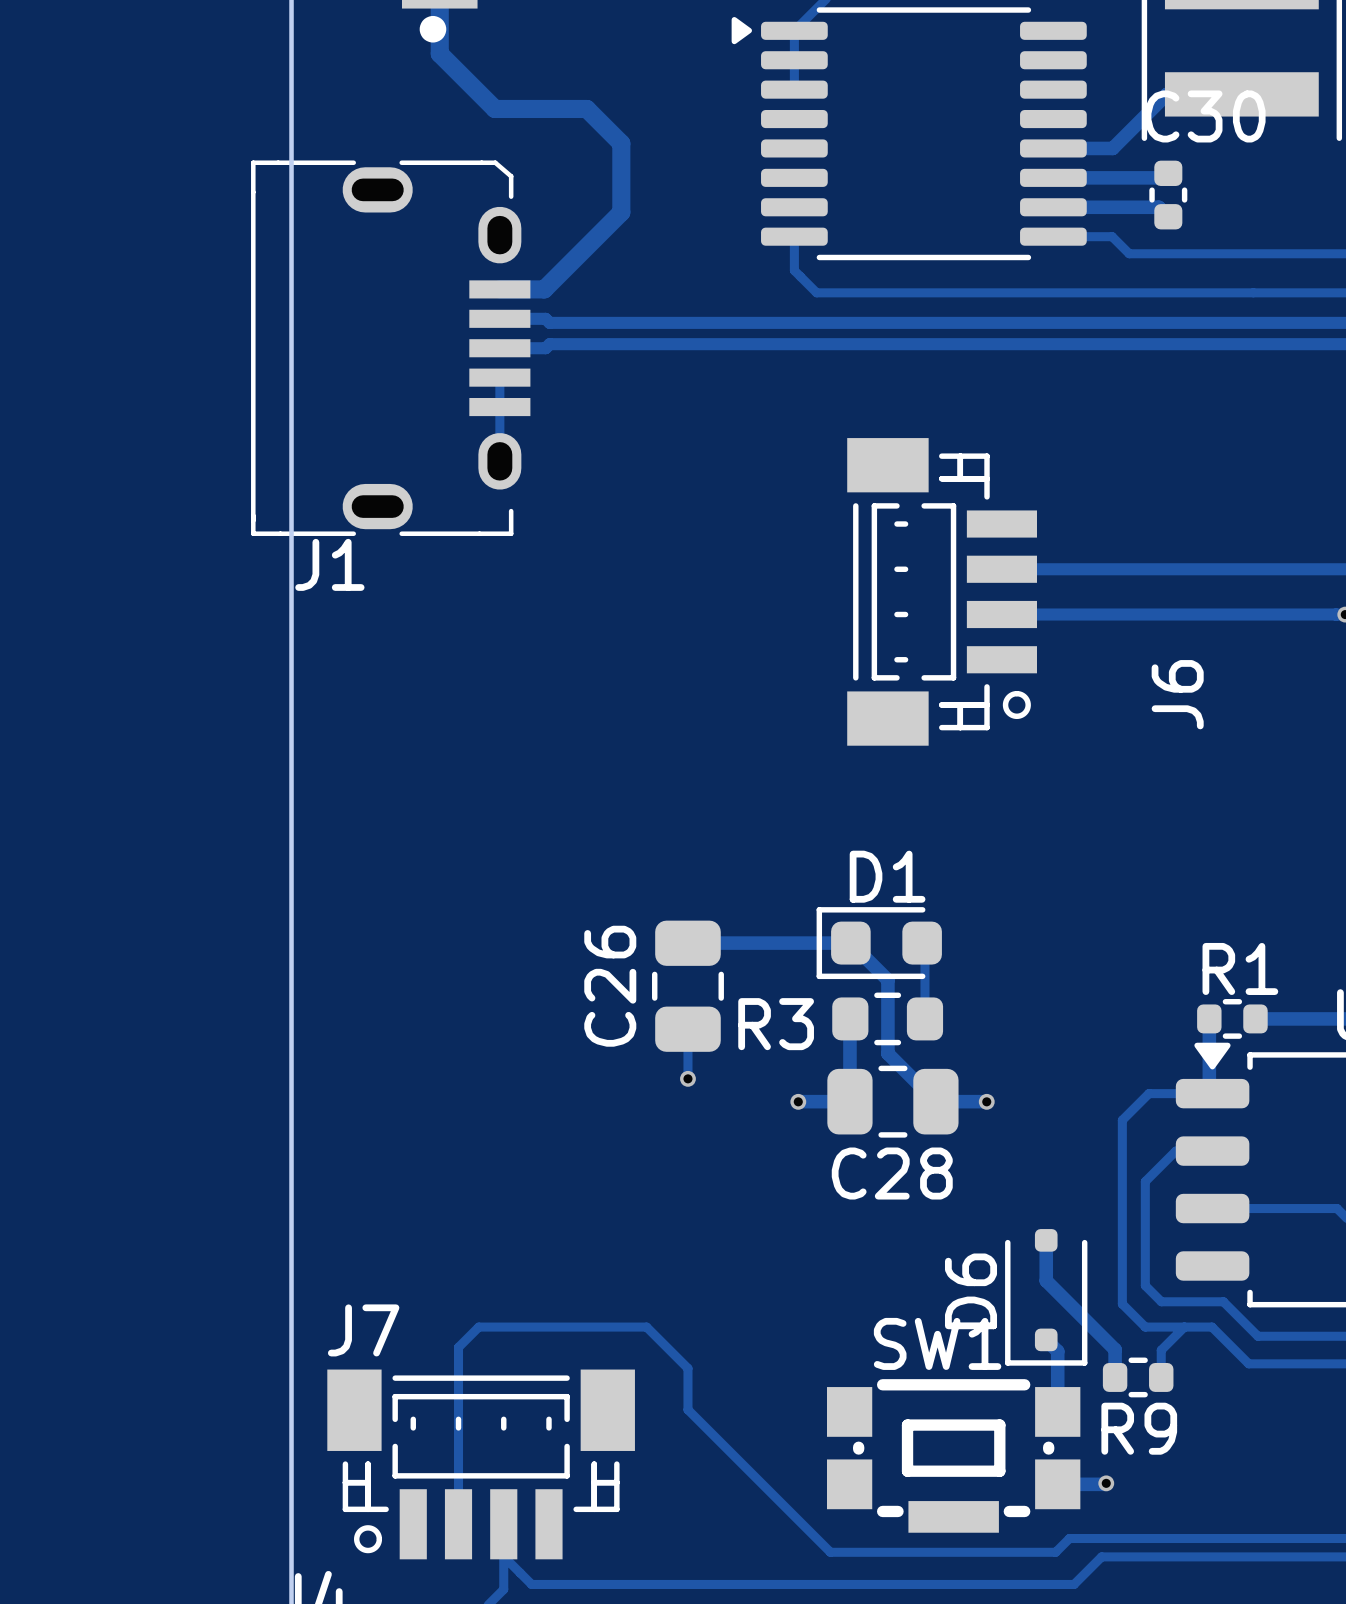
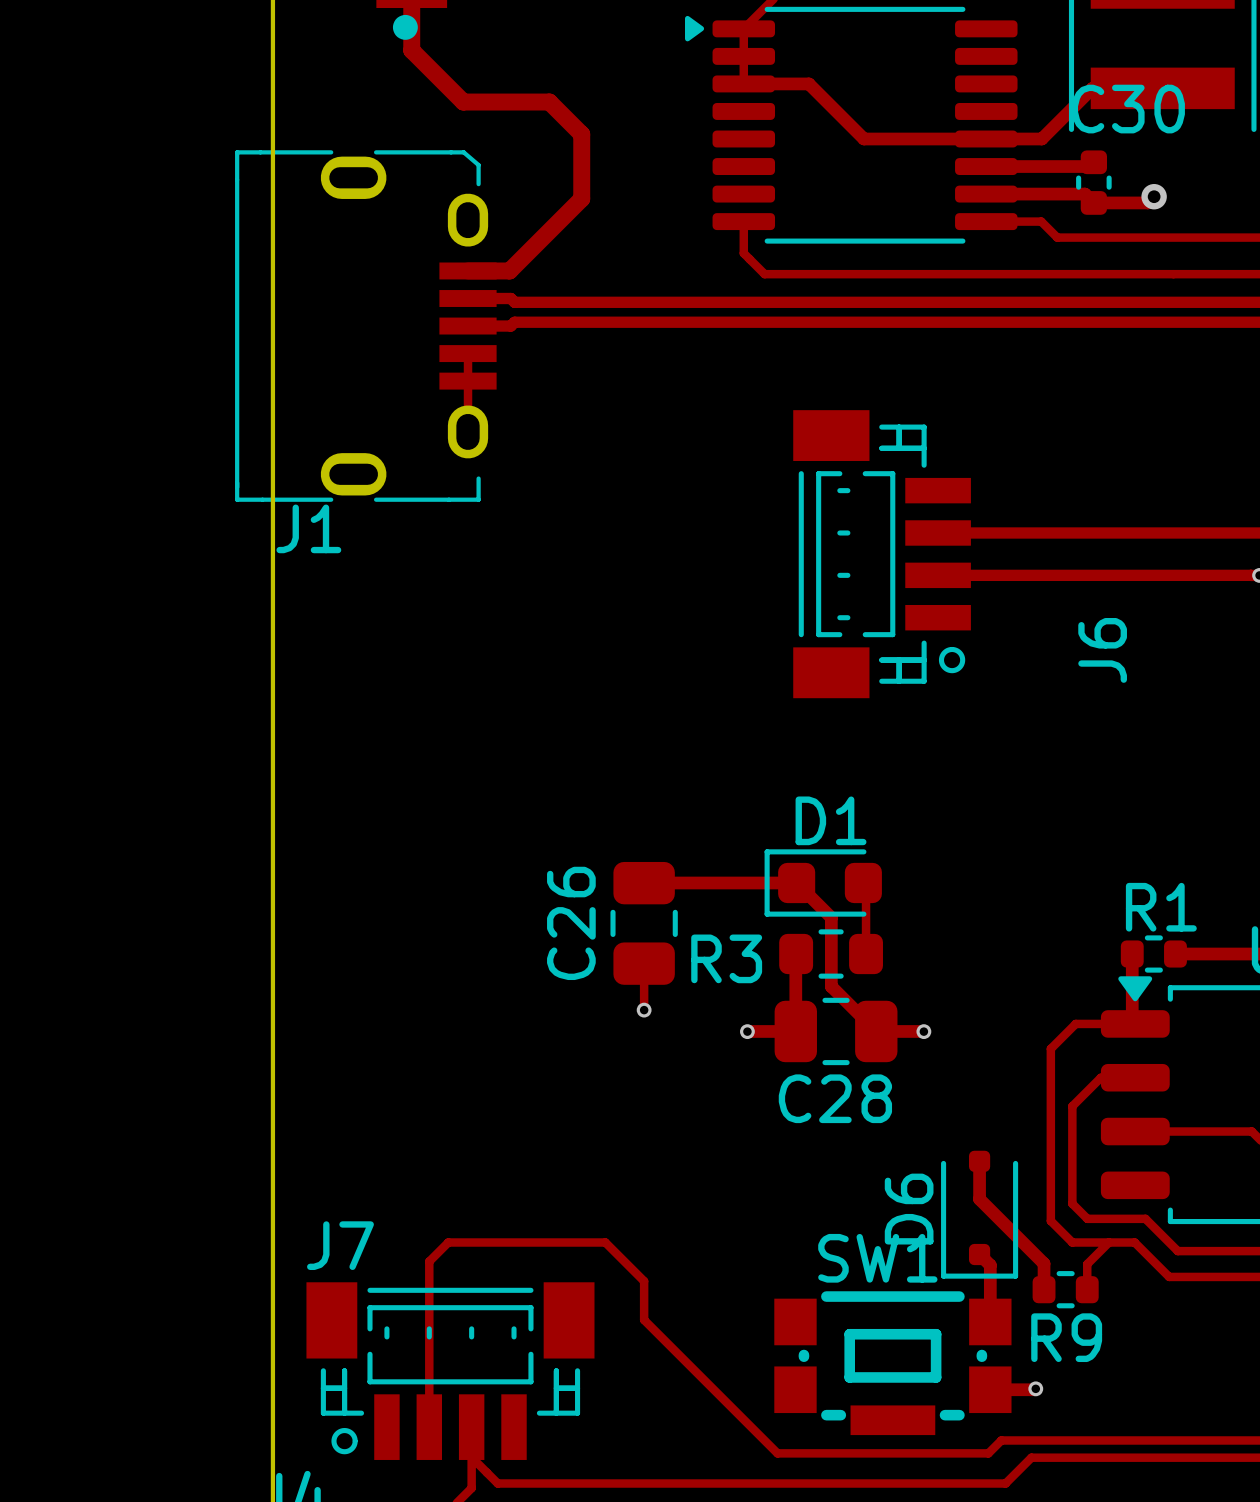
track: none -> (743, 83) (808, 83) (864, 139) (986, 139)
track: none -> (1154, 196) (1147, 202) (1093, 202)
via: none -> (1154, 196)

